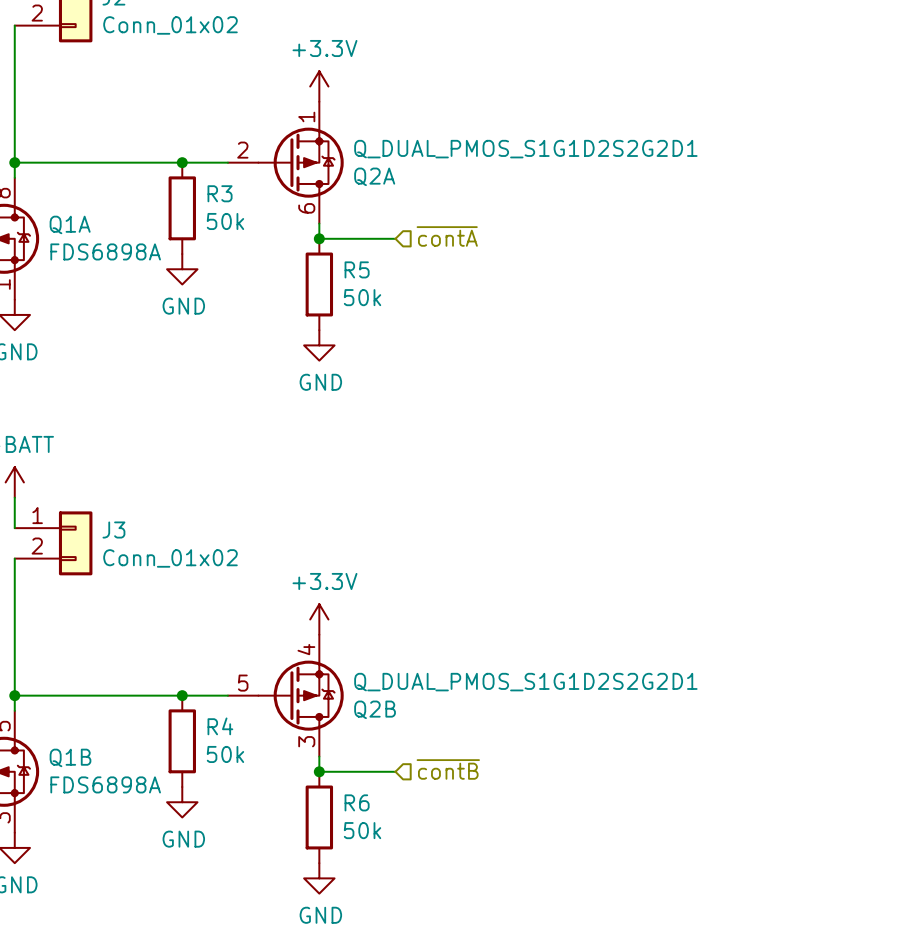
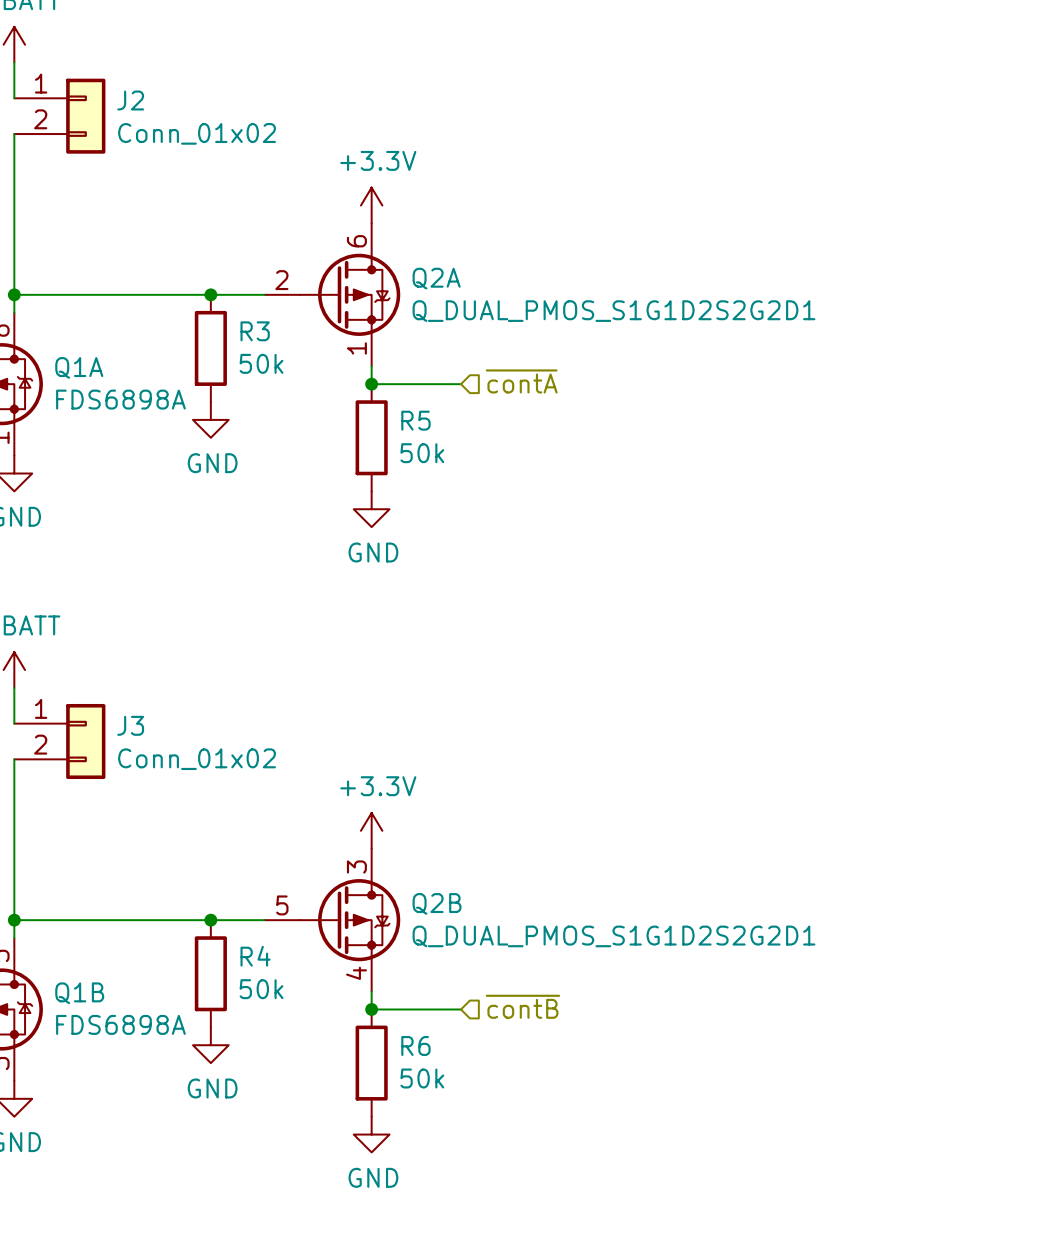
Q2A flip: as is (301, 162) -> up-down (350, 294)
Q2B flip: as is (301, 695) -> up-down (350, 920)

